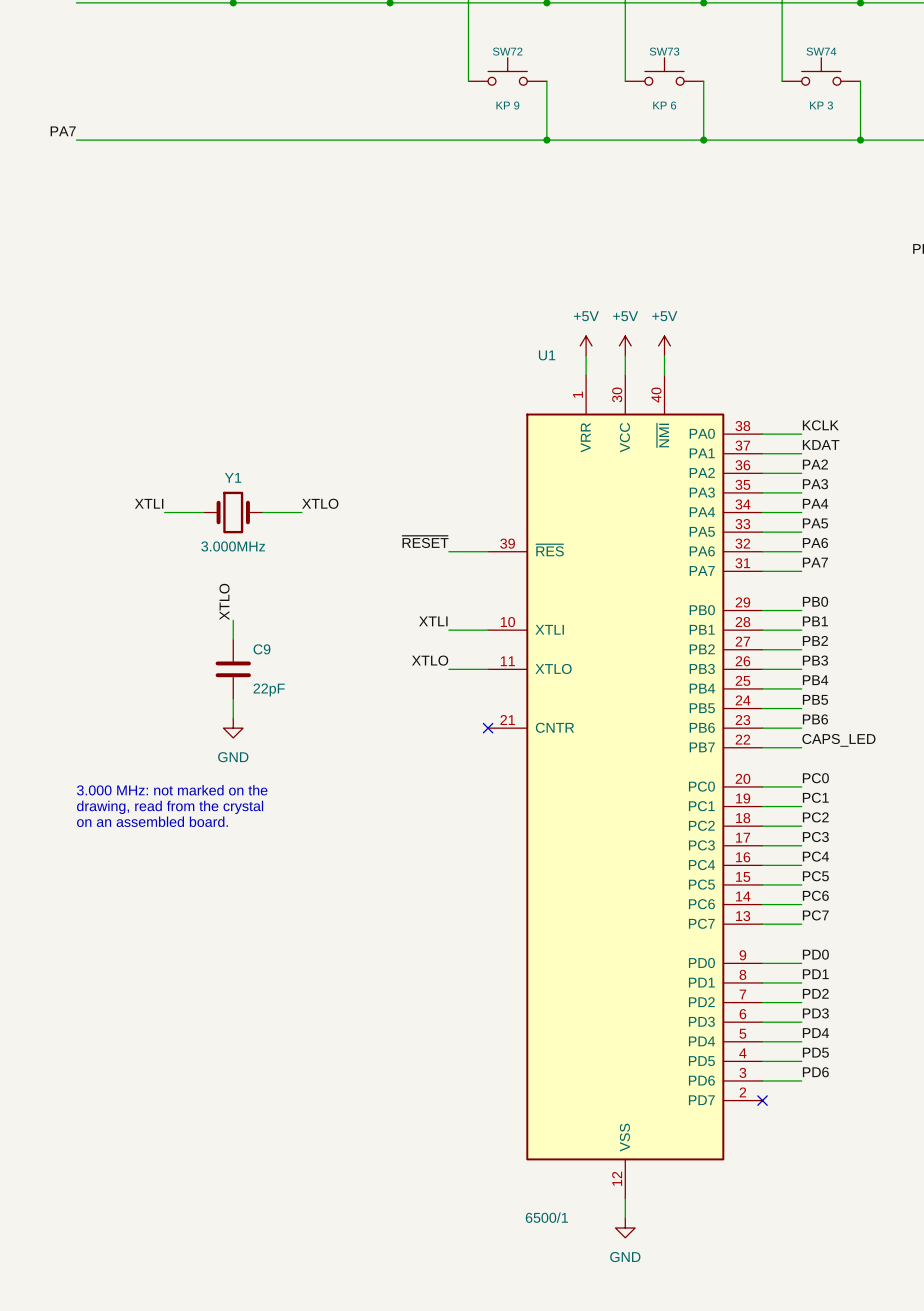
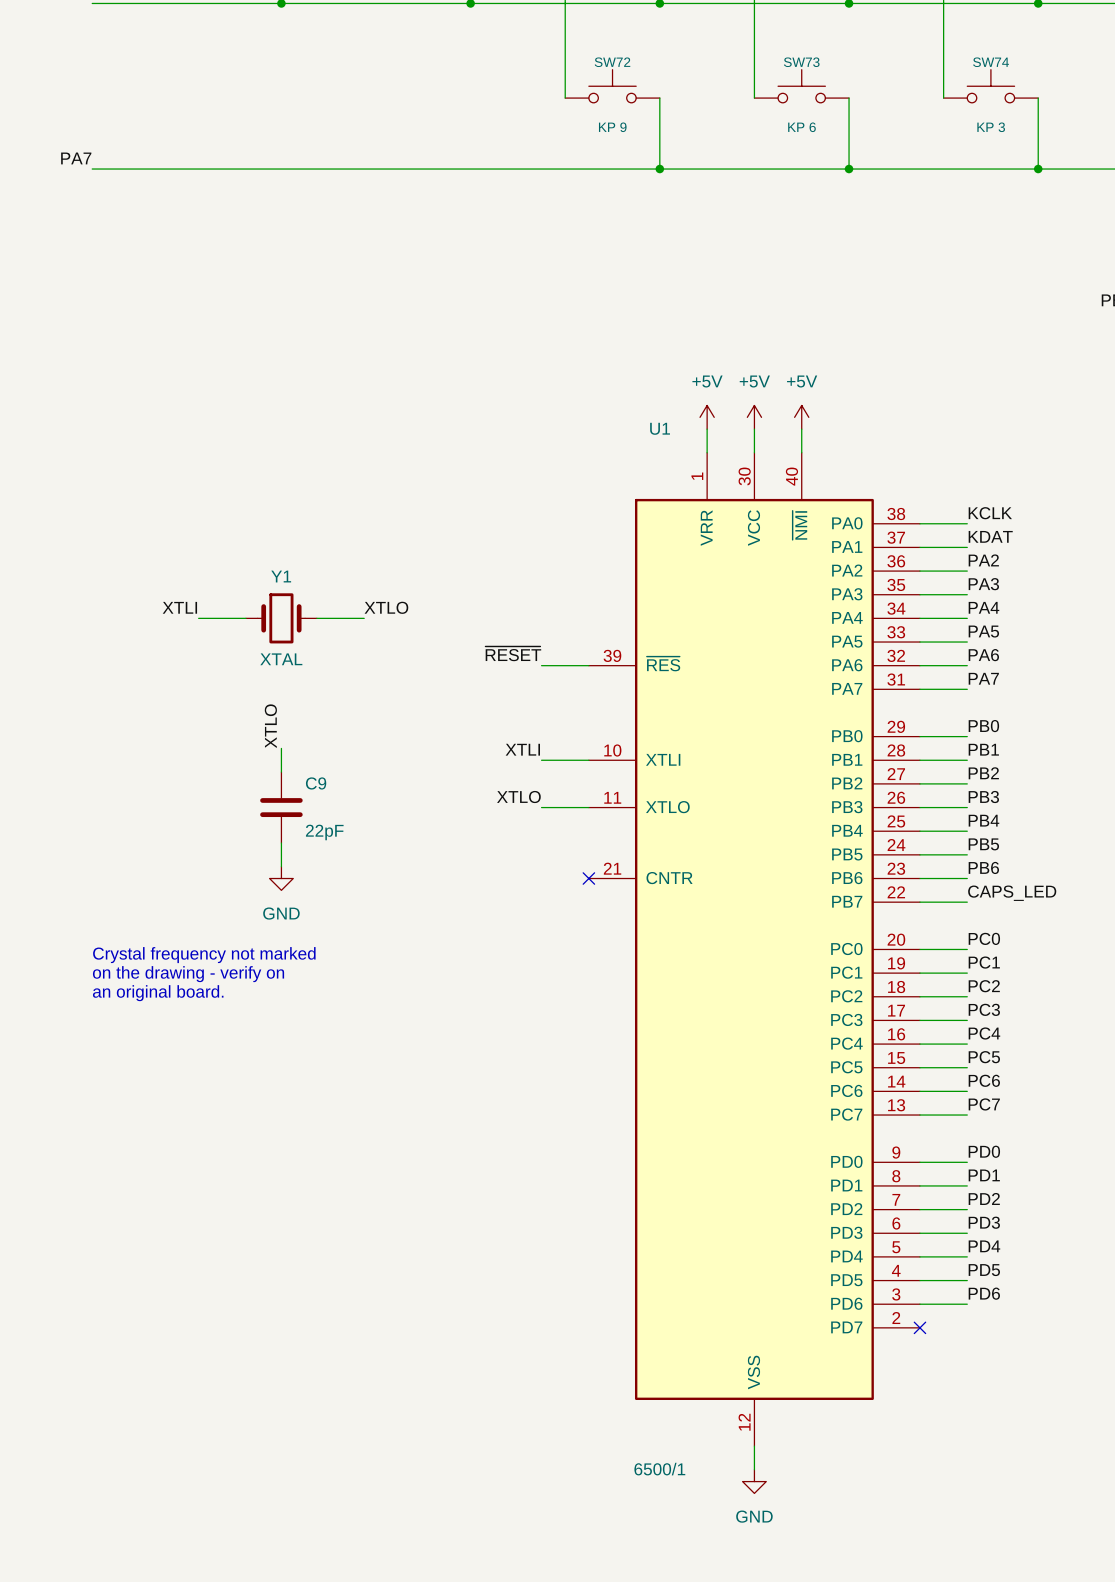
Y1 value: 3.000MHz (233, 546) -> XTAL (281, 659)
text: 3.000 MHz: not marked on the (172, 790) -> Crystal frequency not marked (204, 955)
text: drawing, read from the crystal (170, 807) -> on the drawing - verify on (188, 974)
text: on an assembled board. (152, 821) -> an original board. (158, 993)

